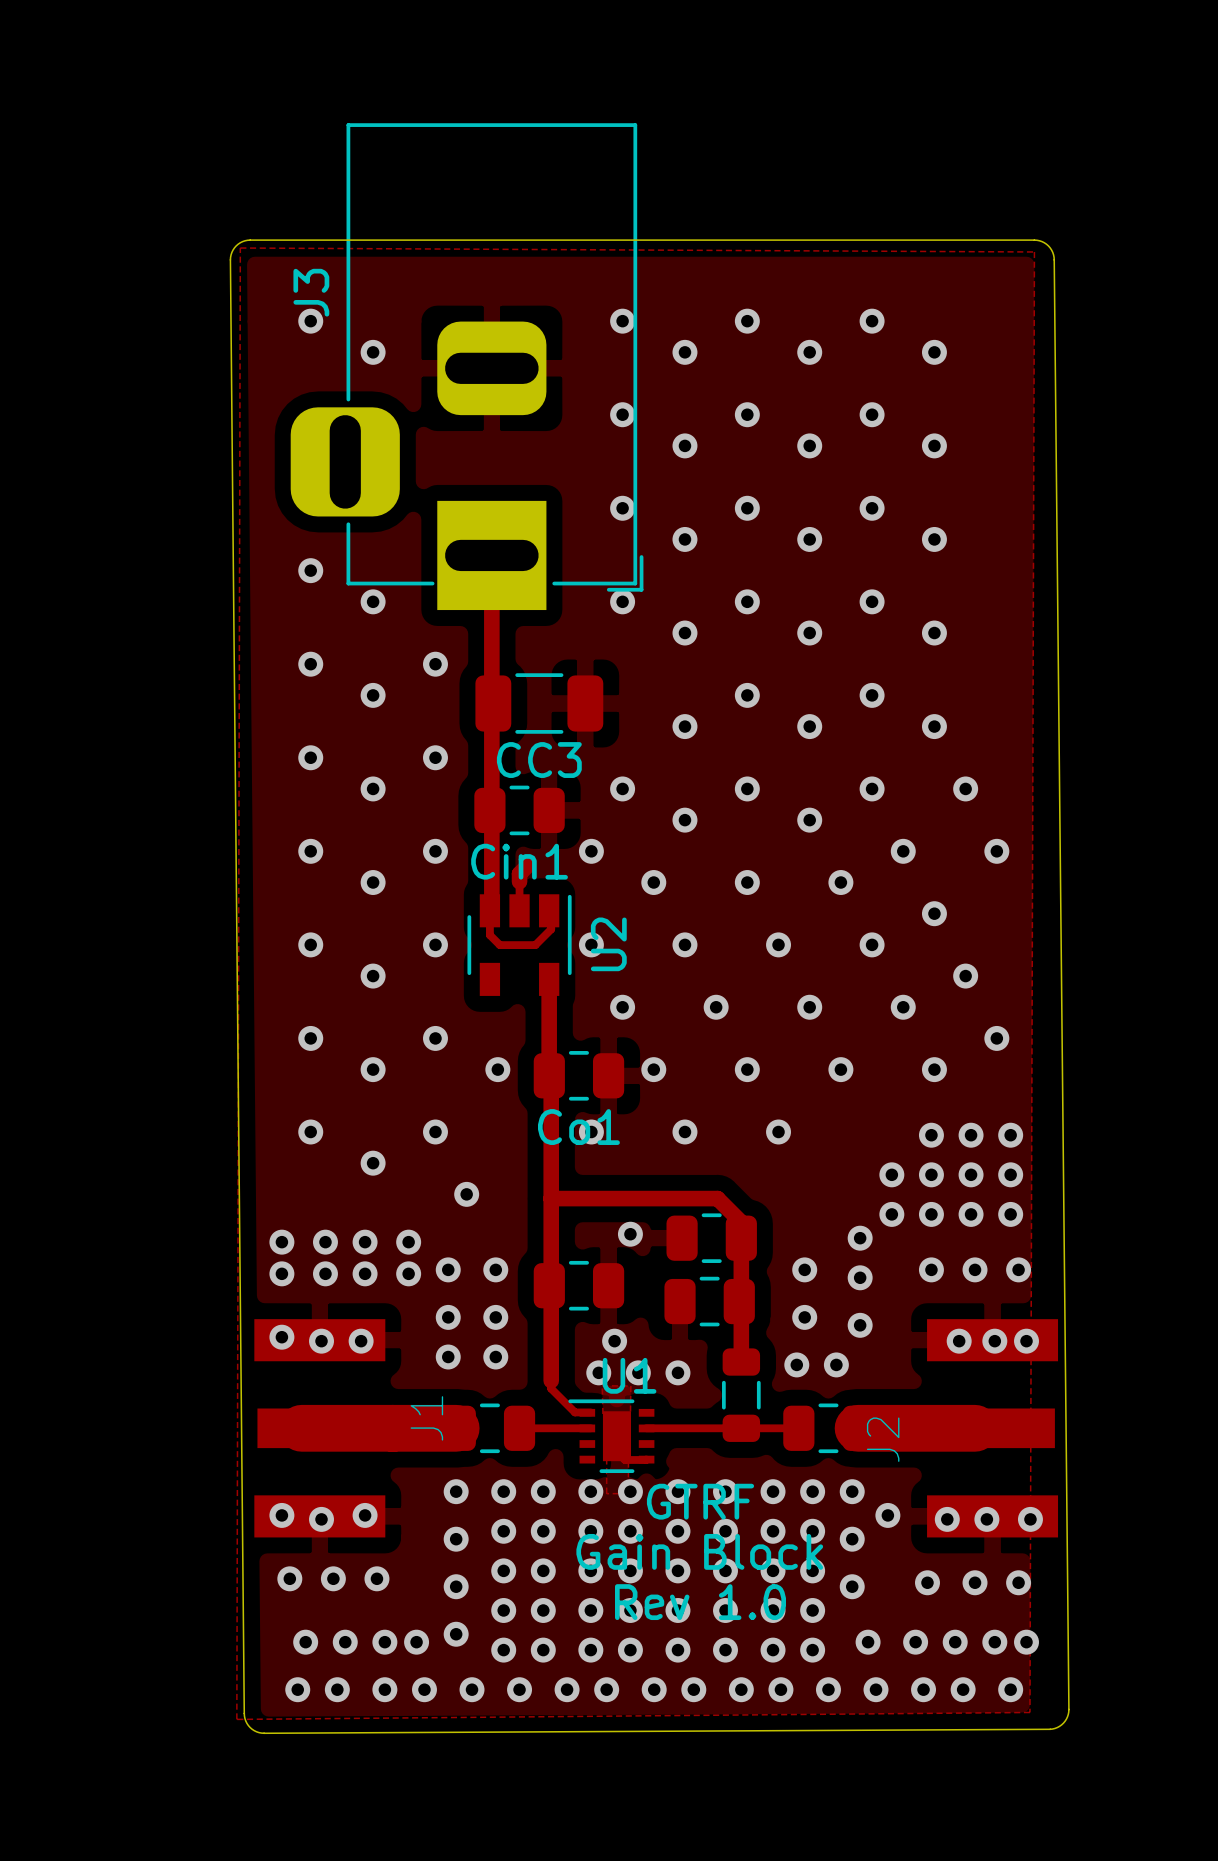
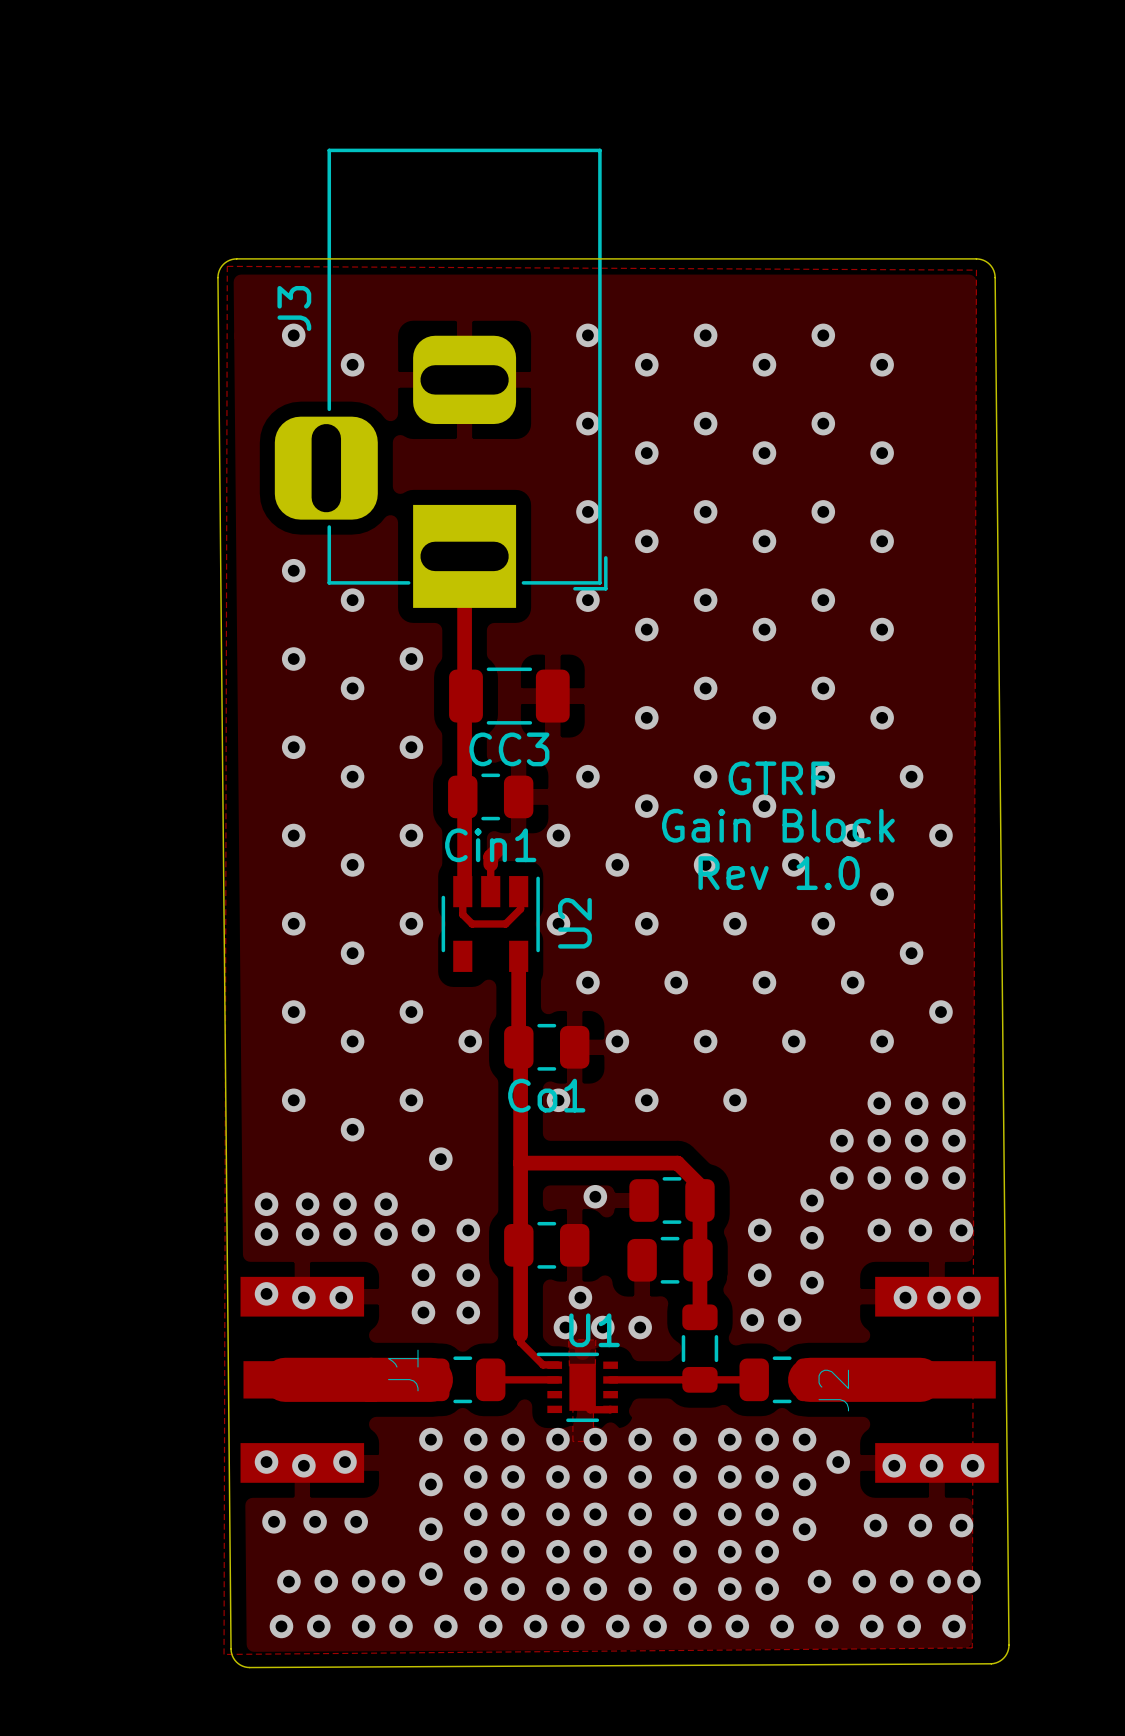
text position: GTRF (700, 1501) -> GTRF (779, 778)
text position: Gain Block (699, 1551) -> Gain Block (778, 825)
text position: Rev 1.0 (700, 1602) -> Rev 1.0 (779, 873)

